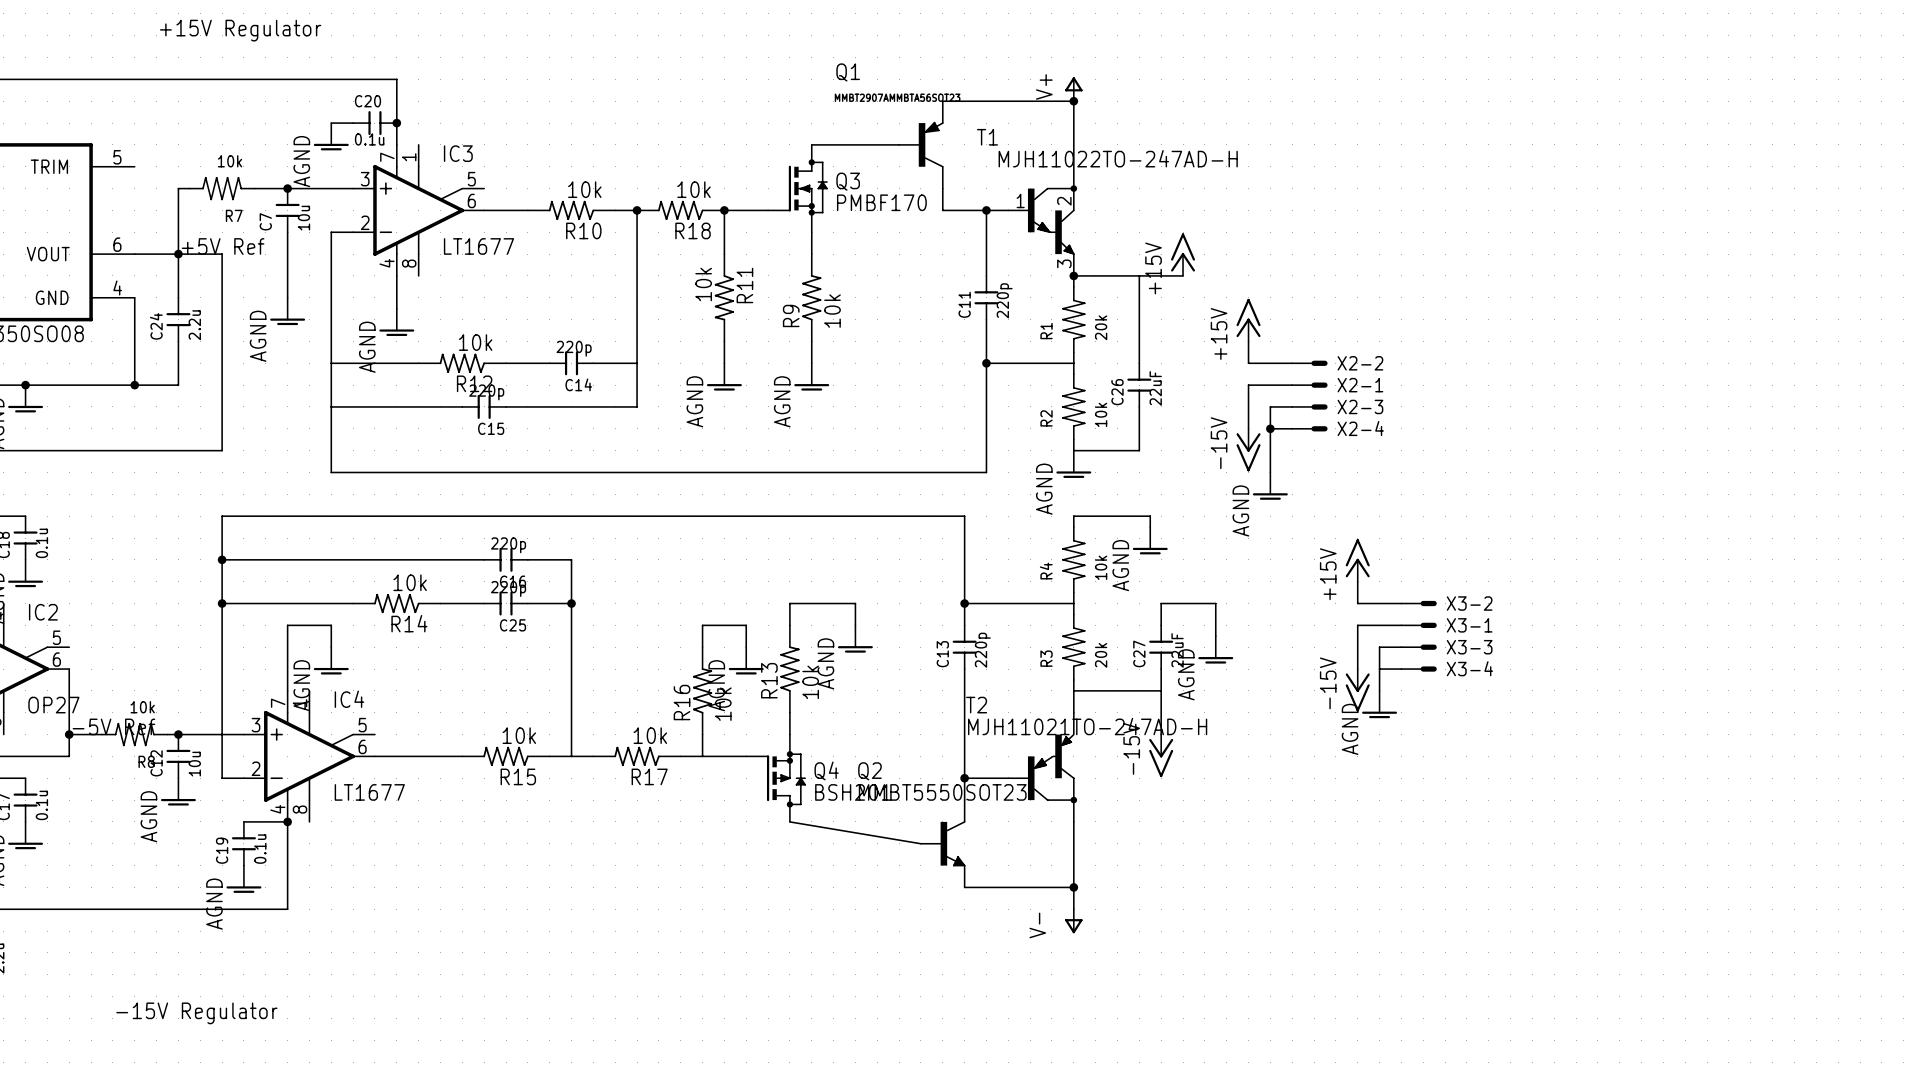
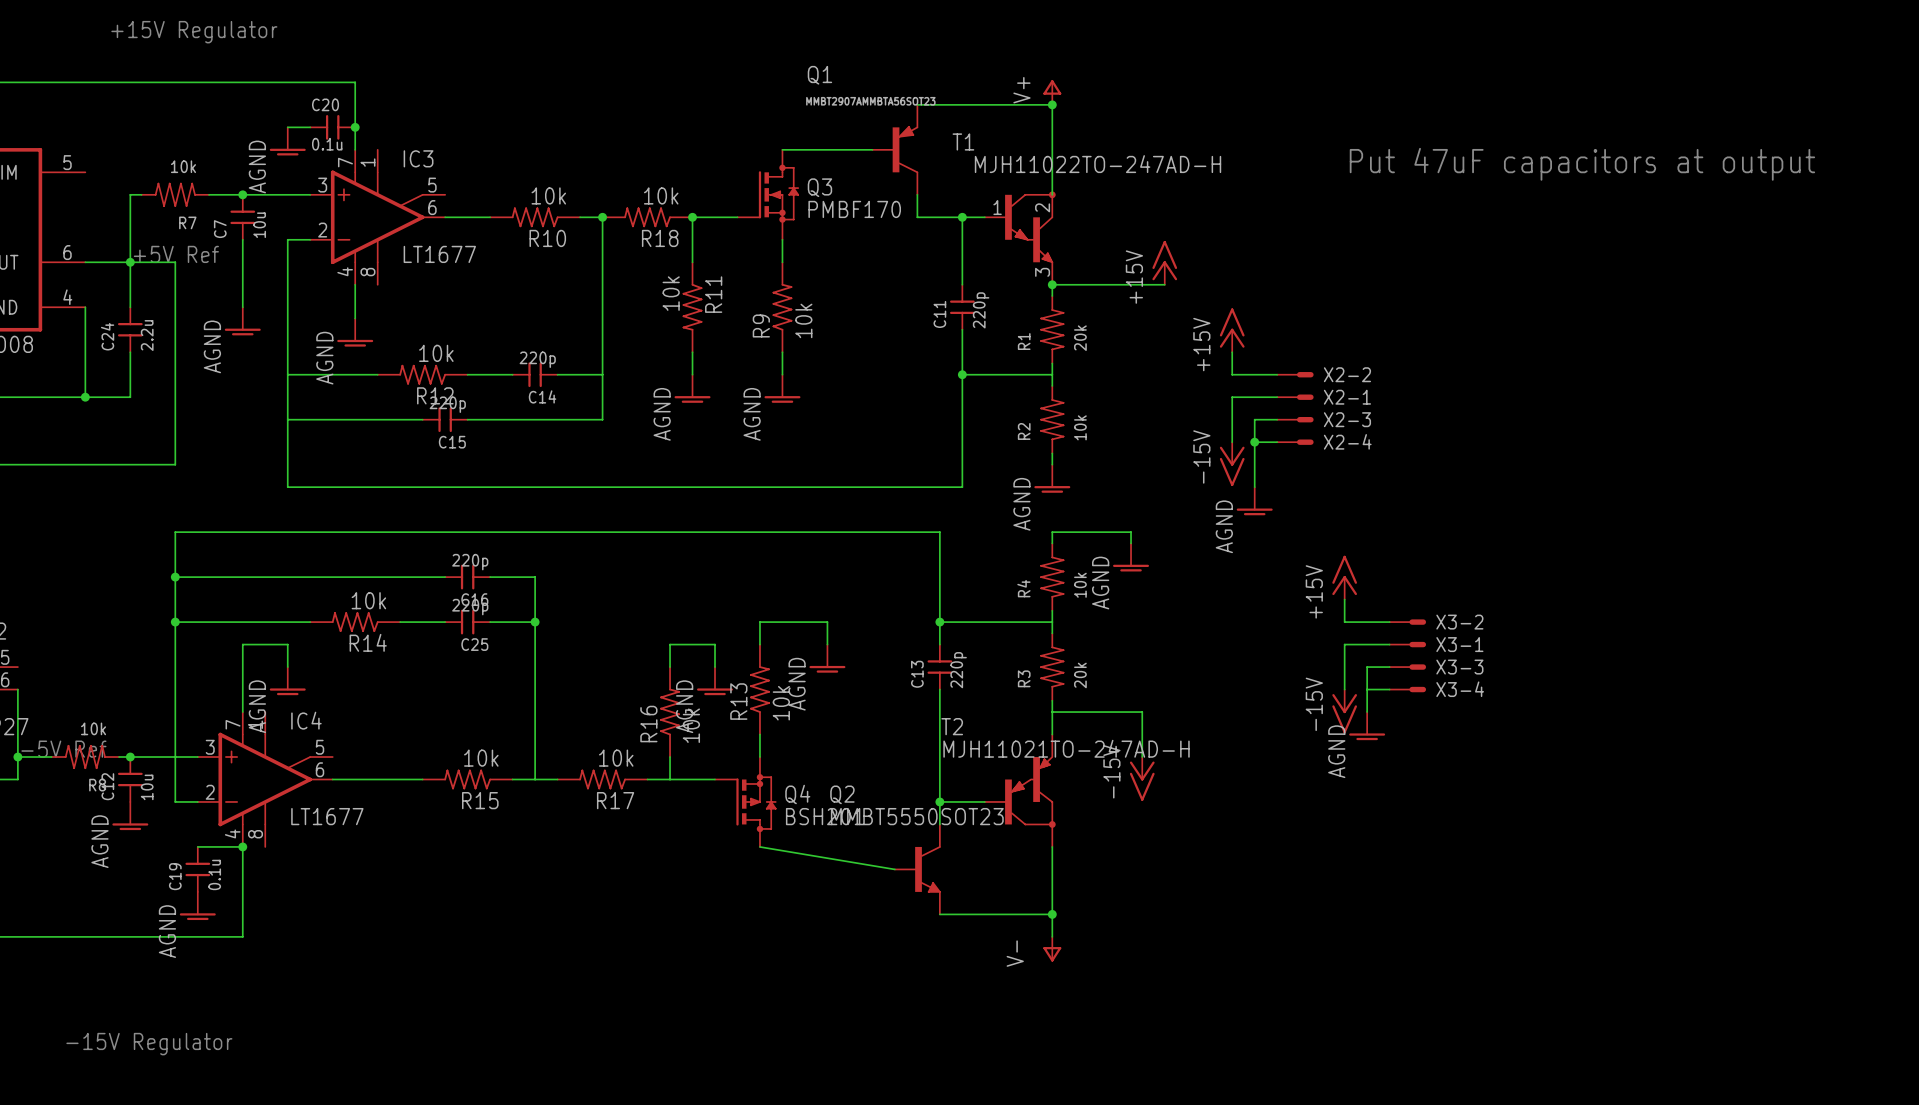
text: none -> Put 47uF capacitors at output (1582, 164)
wire: (1139, 275) (1139, 363) -> none
C26: 22uF (1139, 385) -> none
wire: (1139, 406) (1139, 450) (1073, 450) -> none
wire: (1161, 625) (1161, 603) (1215, 603) (1215, 636) -> none
C27: 22uF (1161, 647) -> none
power symbol: AGND (1215, 649) -> none
wire: (1161, 669) (1161, 690) -> none

